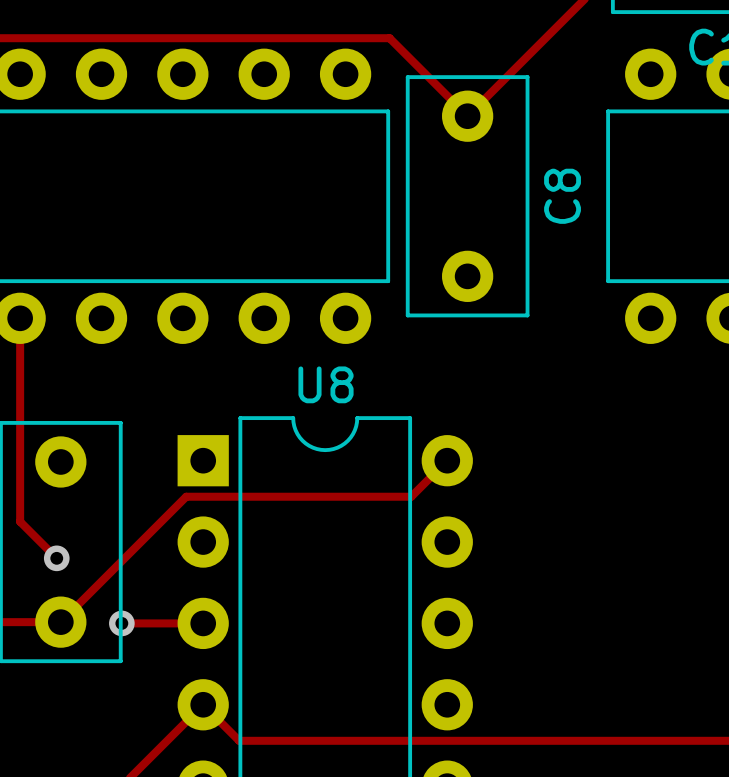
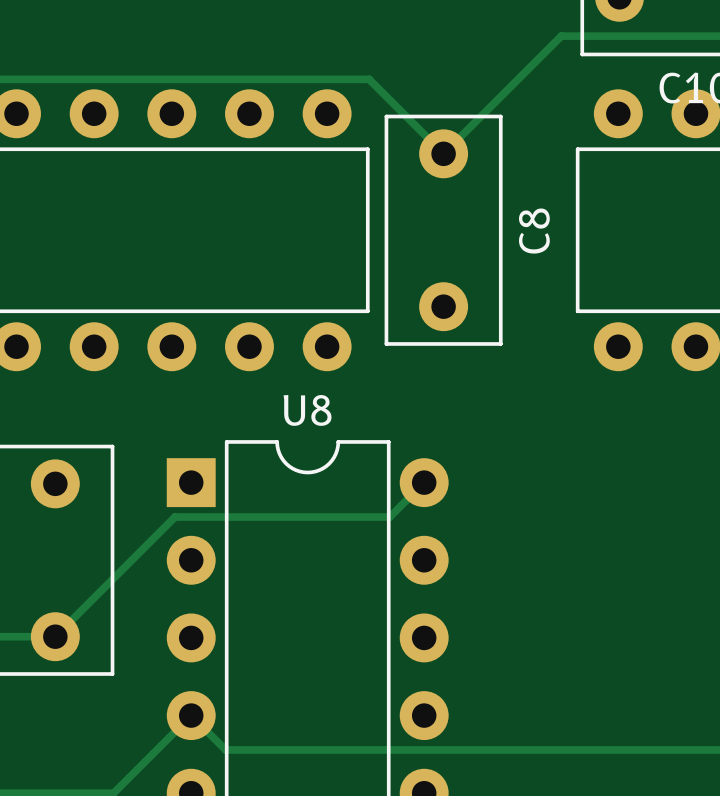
track: (20, 318) (20, 521) (56, 558) -> none
via: (56, 558) -> none
track: (121, 623) (203, 623) -> none
via: (121, 623) -> none

